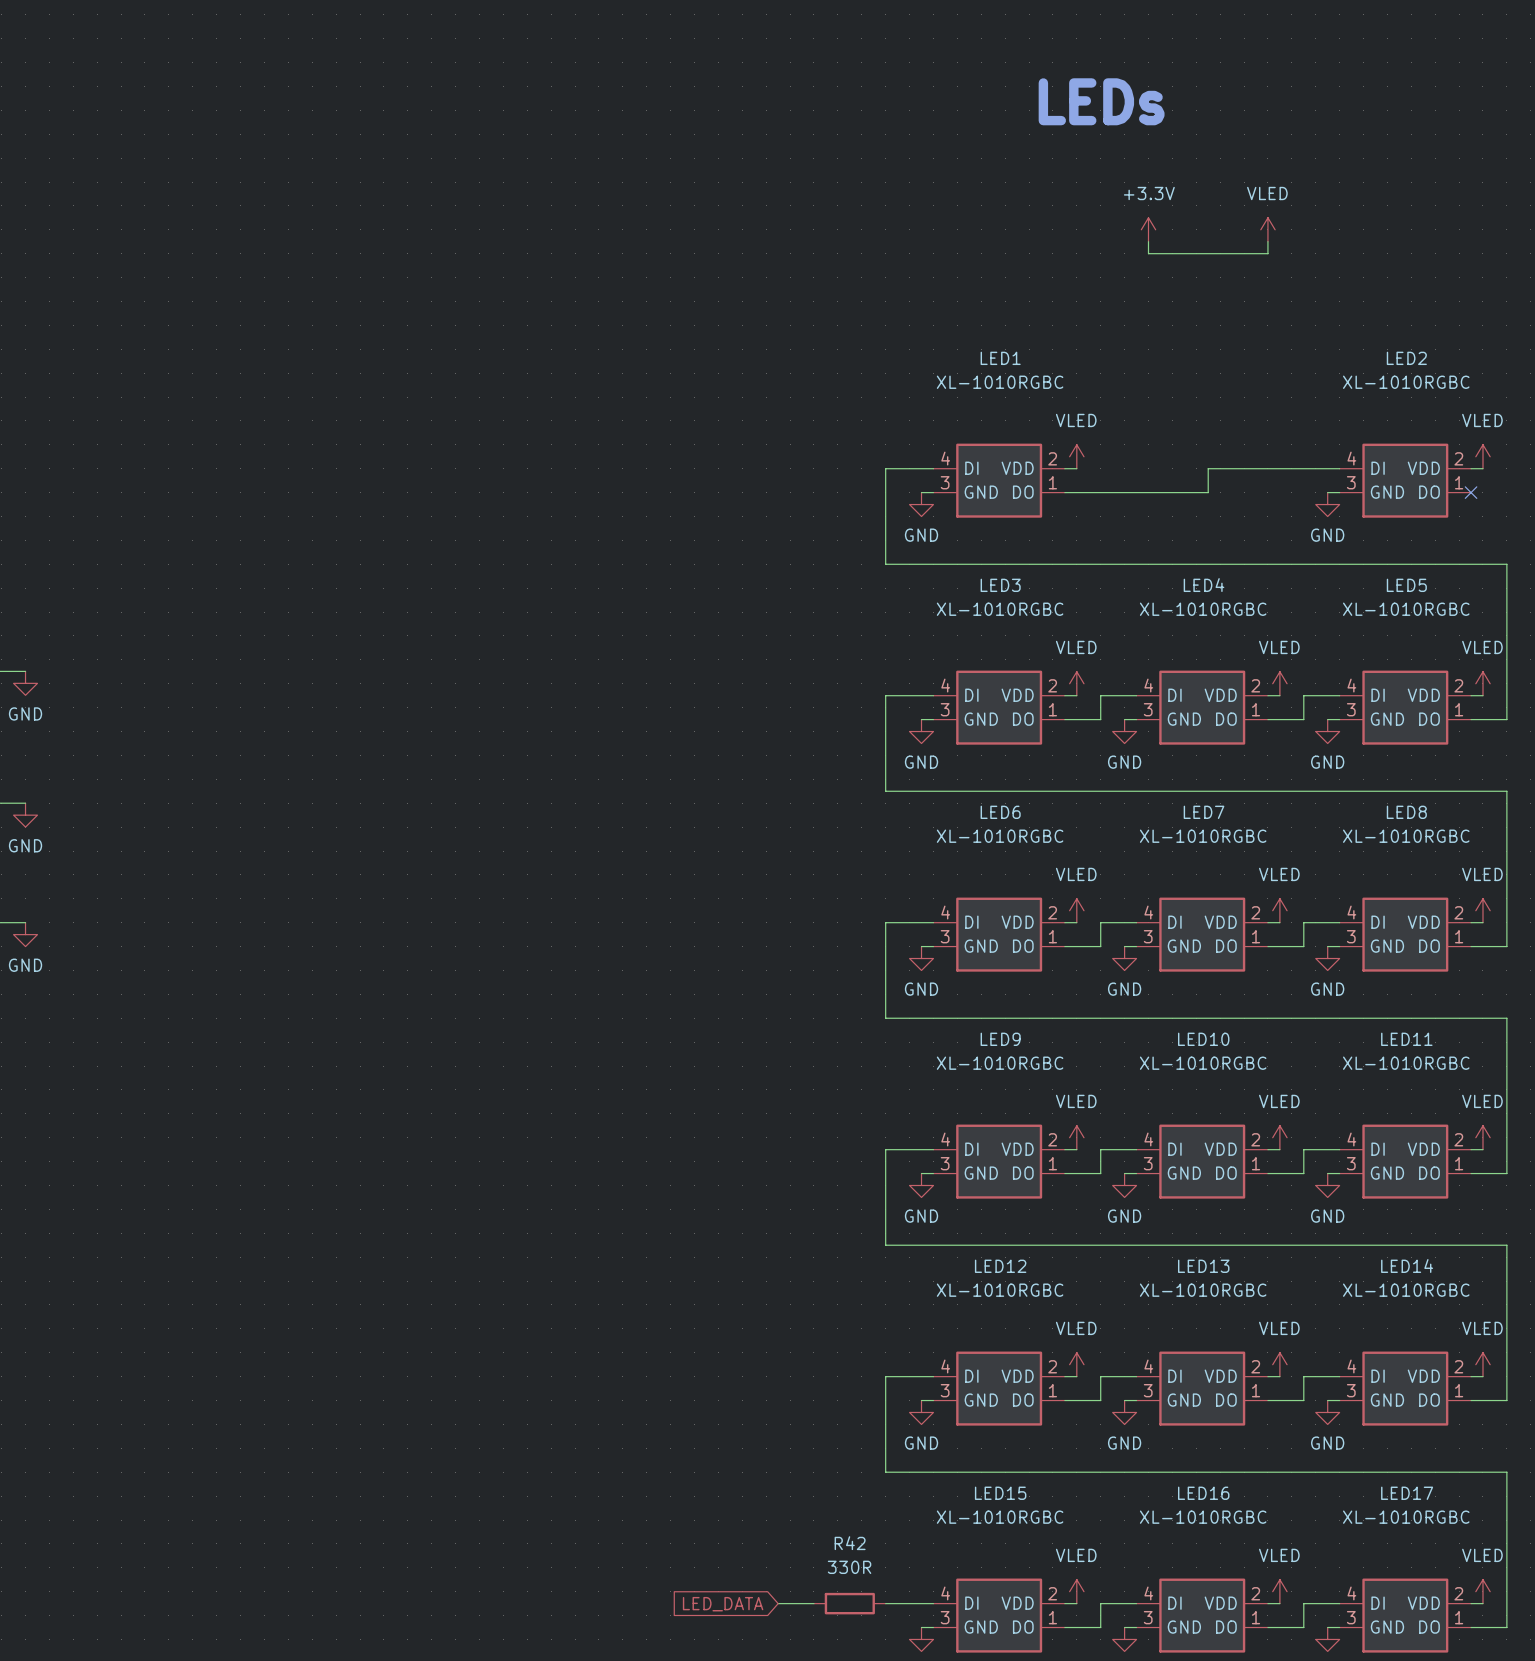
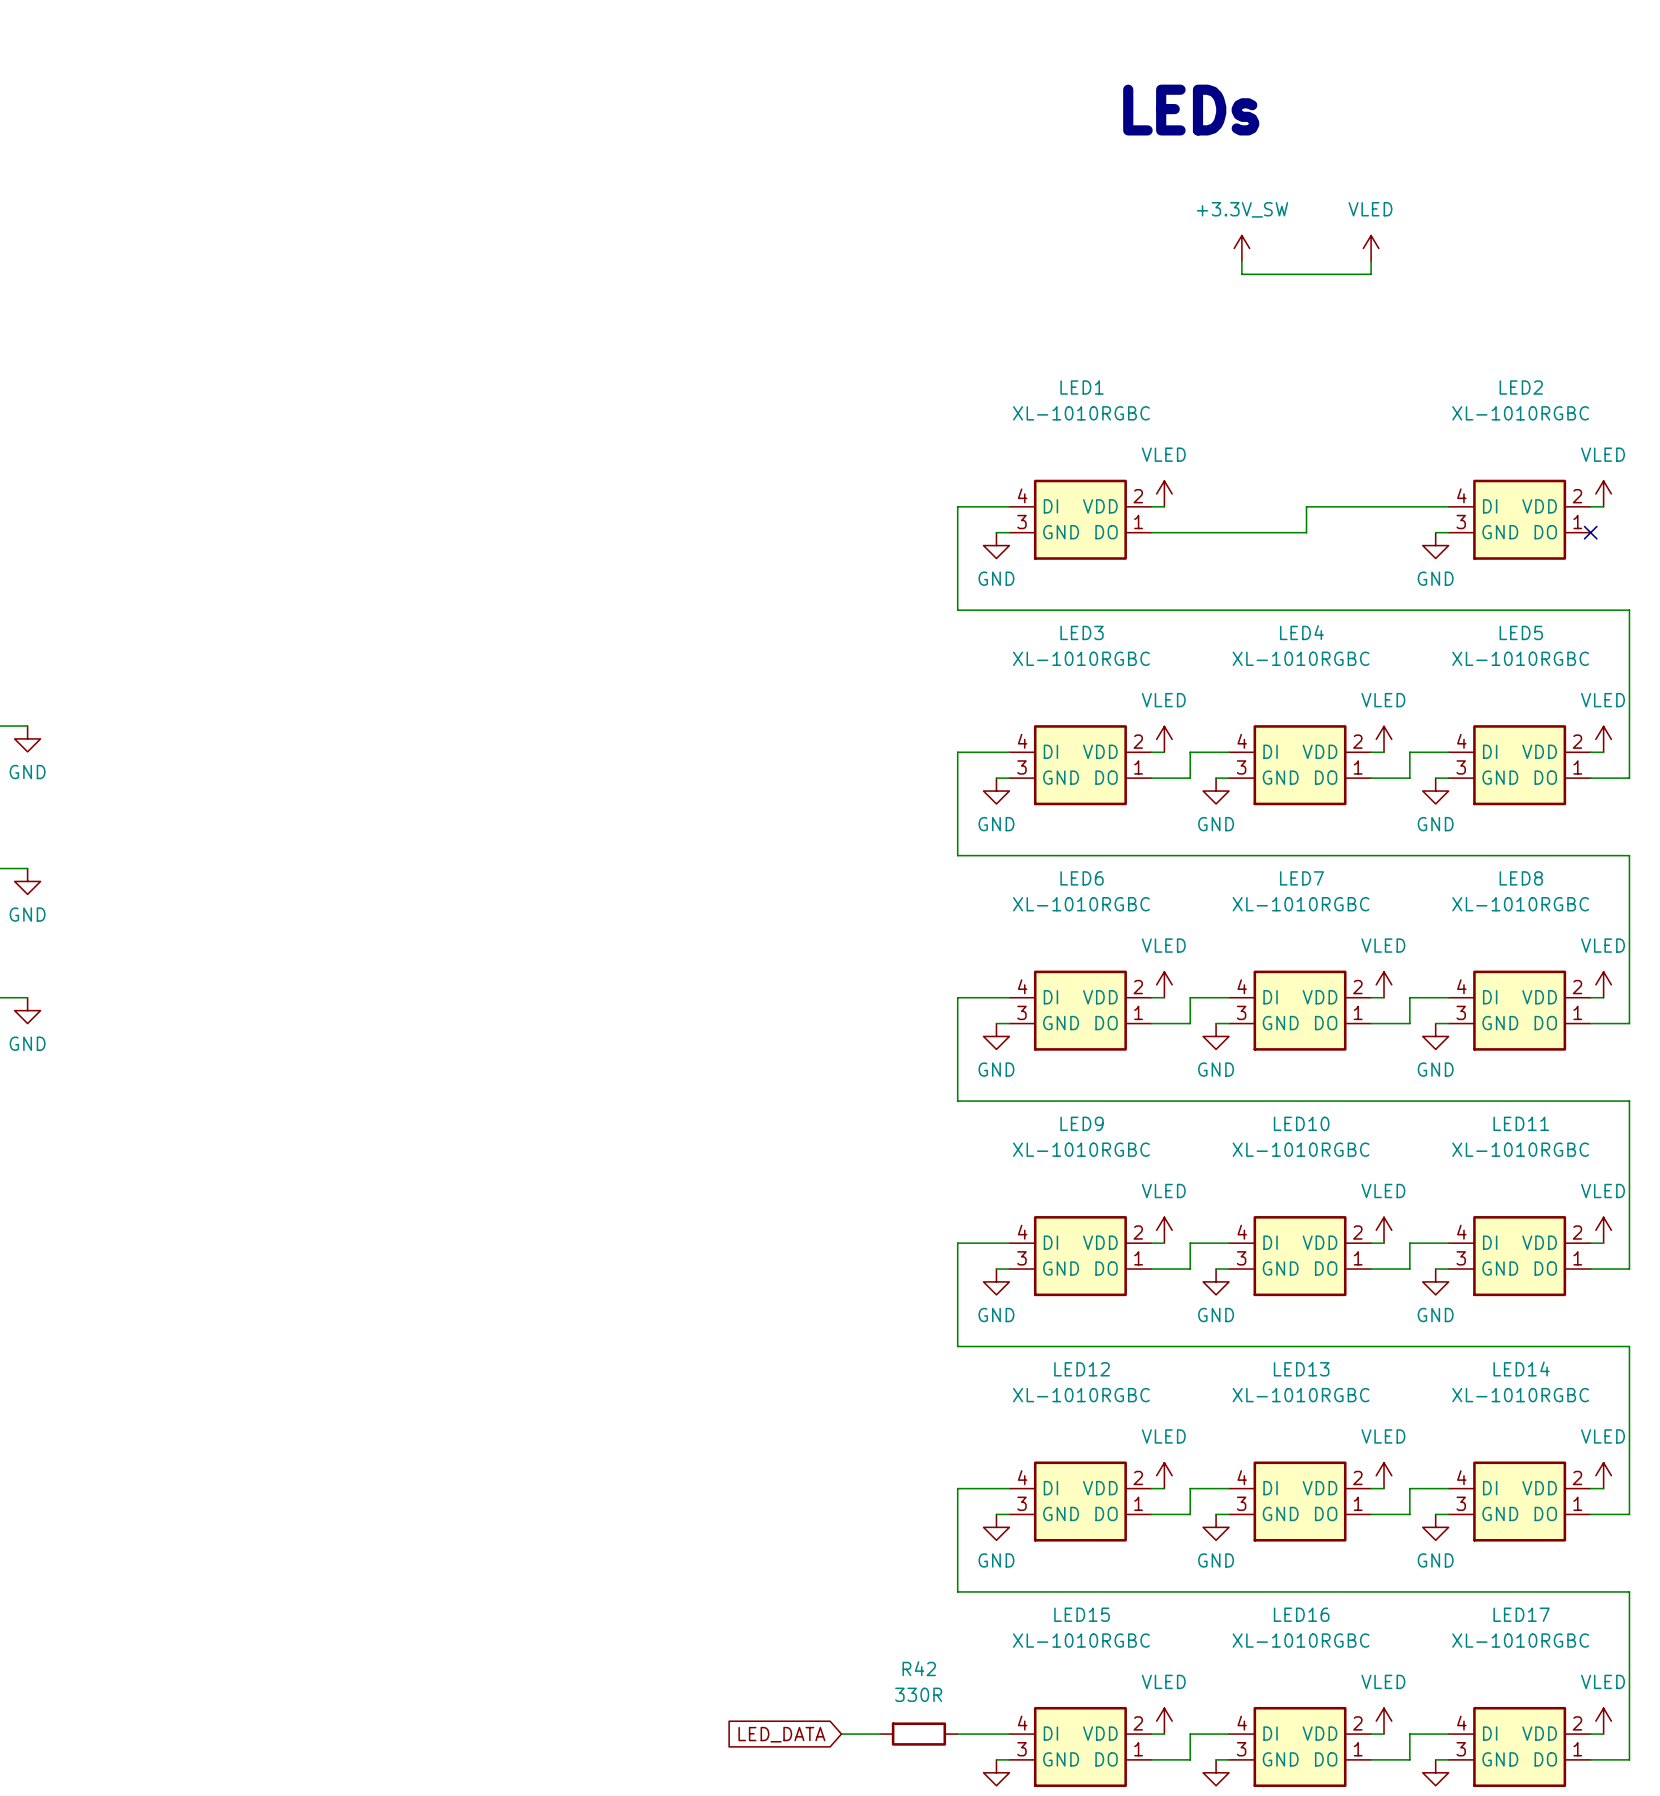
power symbol: +3.3V (1148, 229) -> +3.3V_SW (1241, 248)

